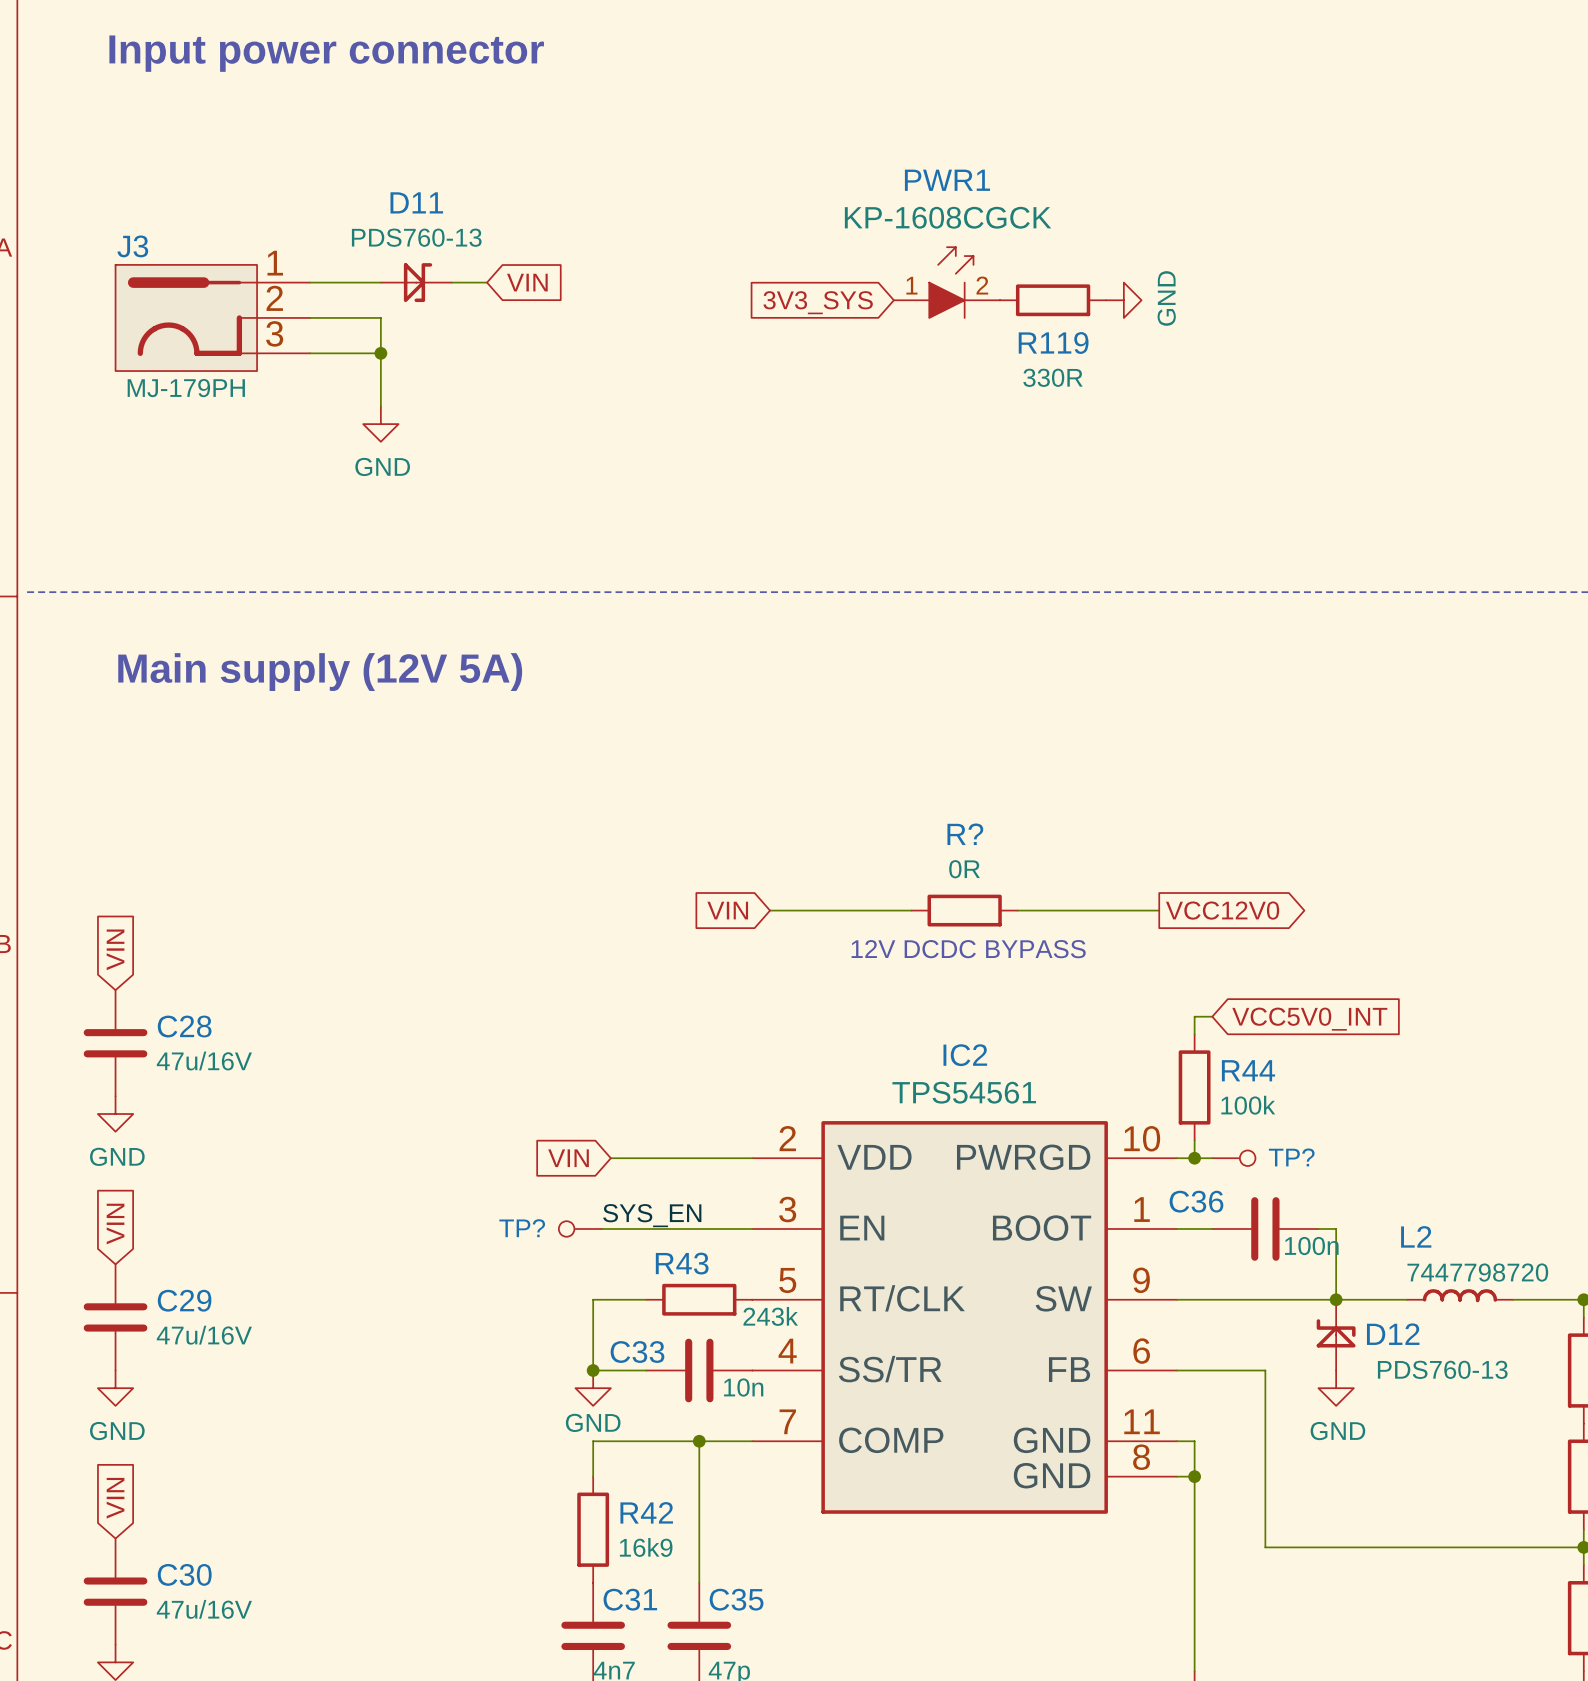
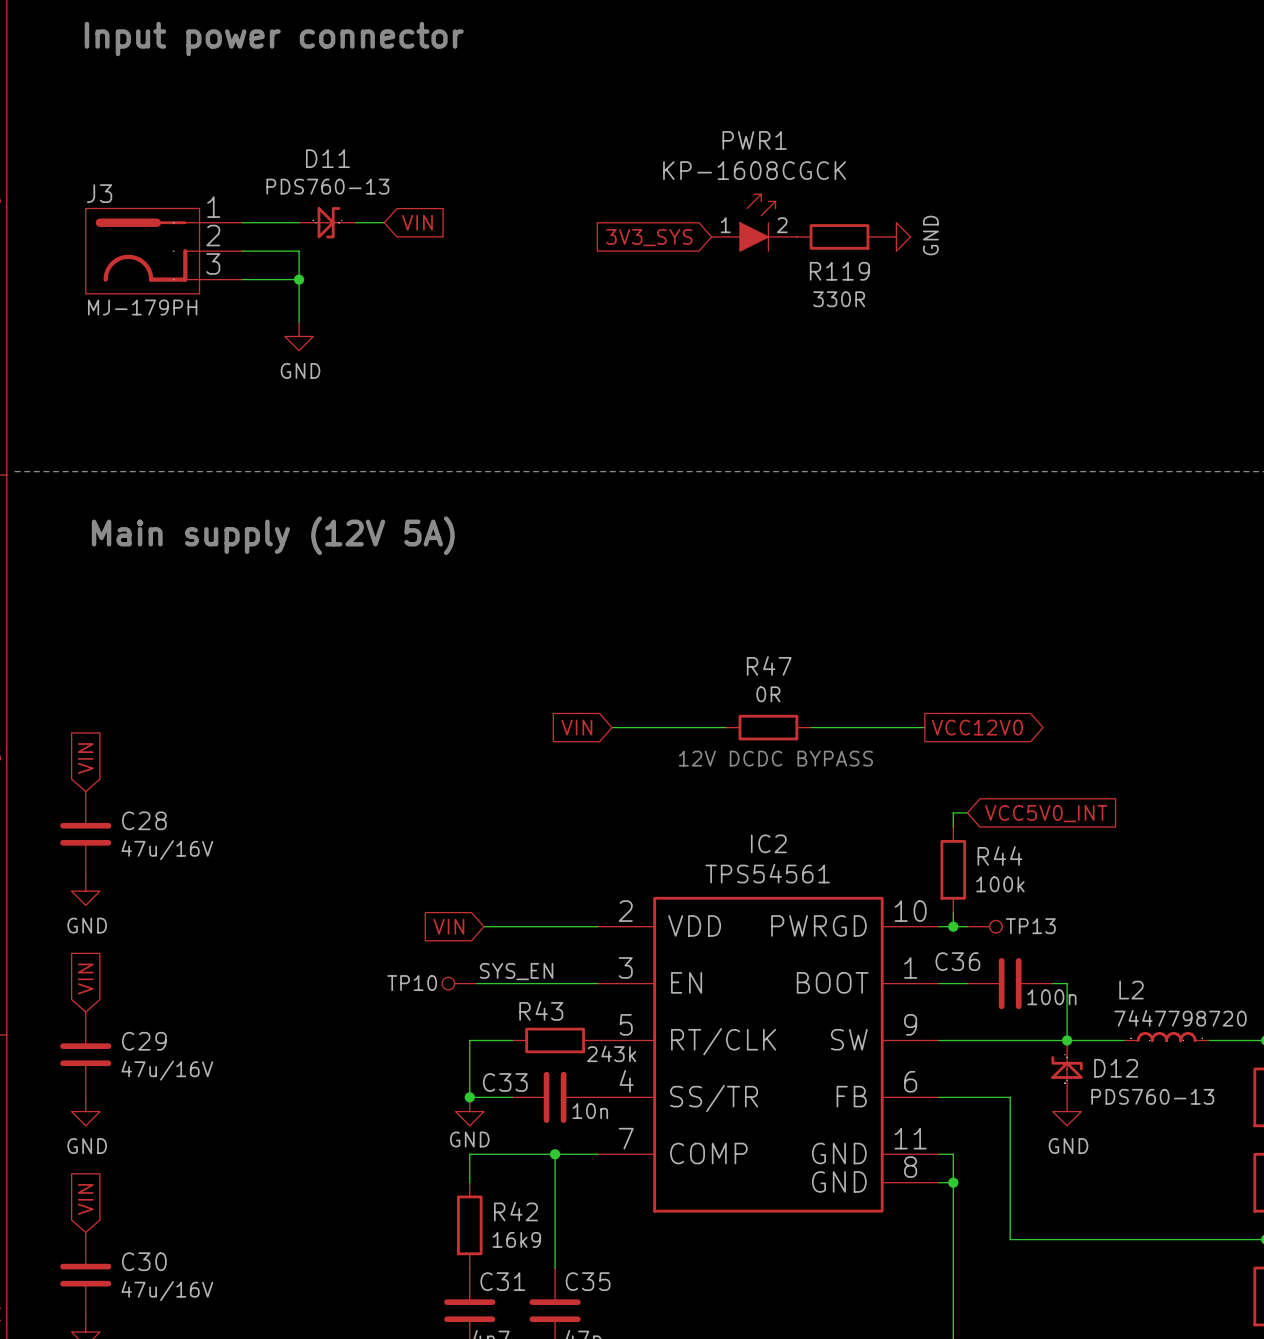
R? name: R? (965, 834) -> R47 (769, 665)
TP? name: TP? (1291, 1157) -> TP13 (1030, 926)
TP? name: TP? (522, 1228) -> TP10 (412, 983)

